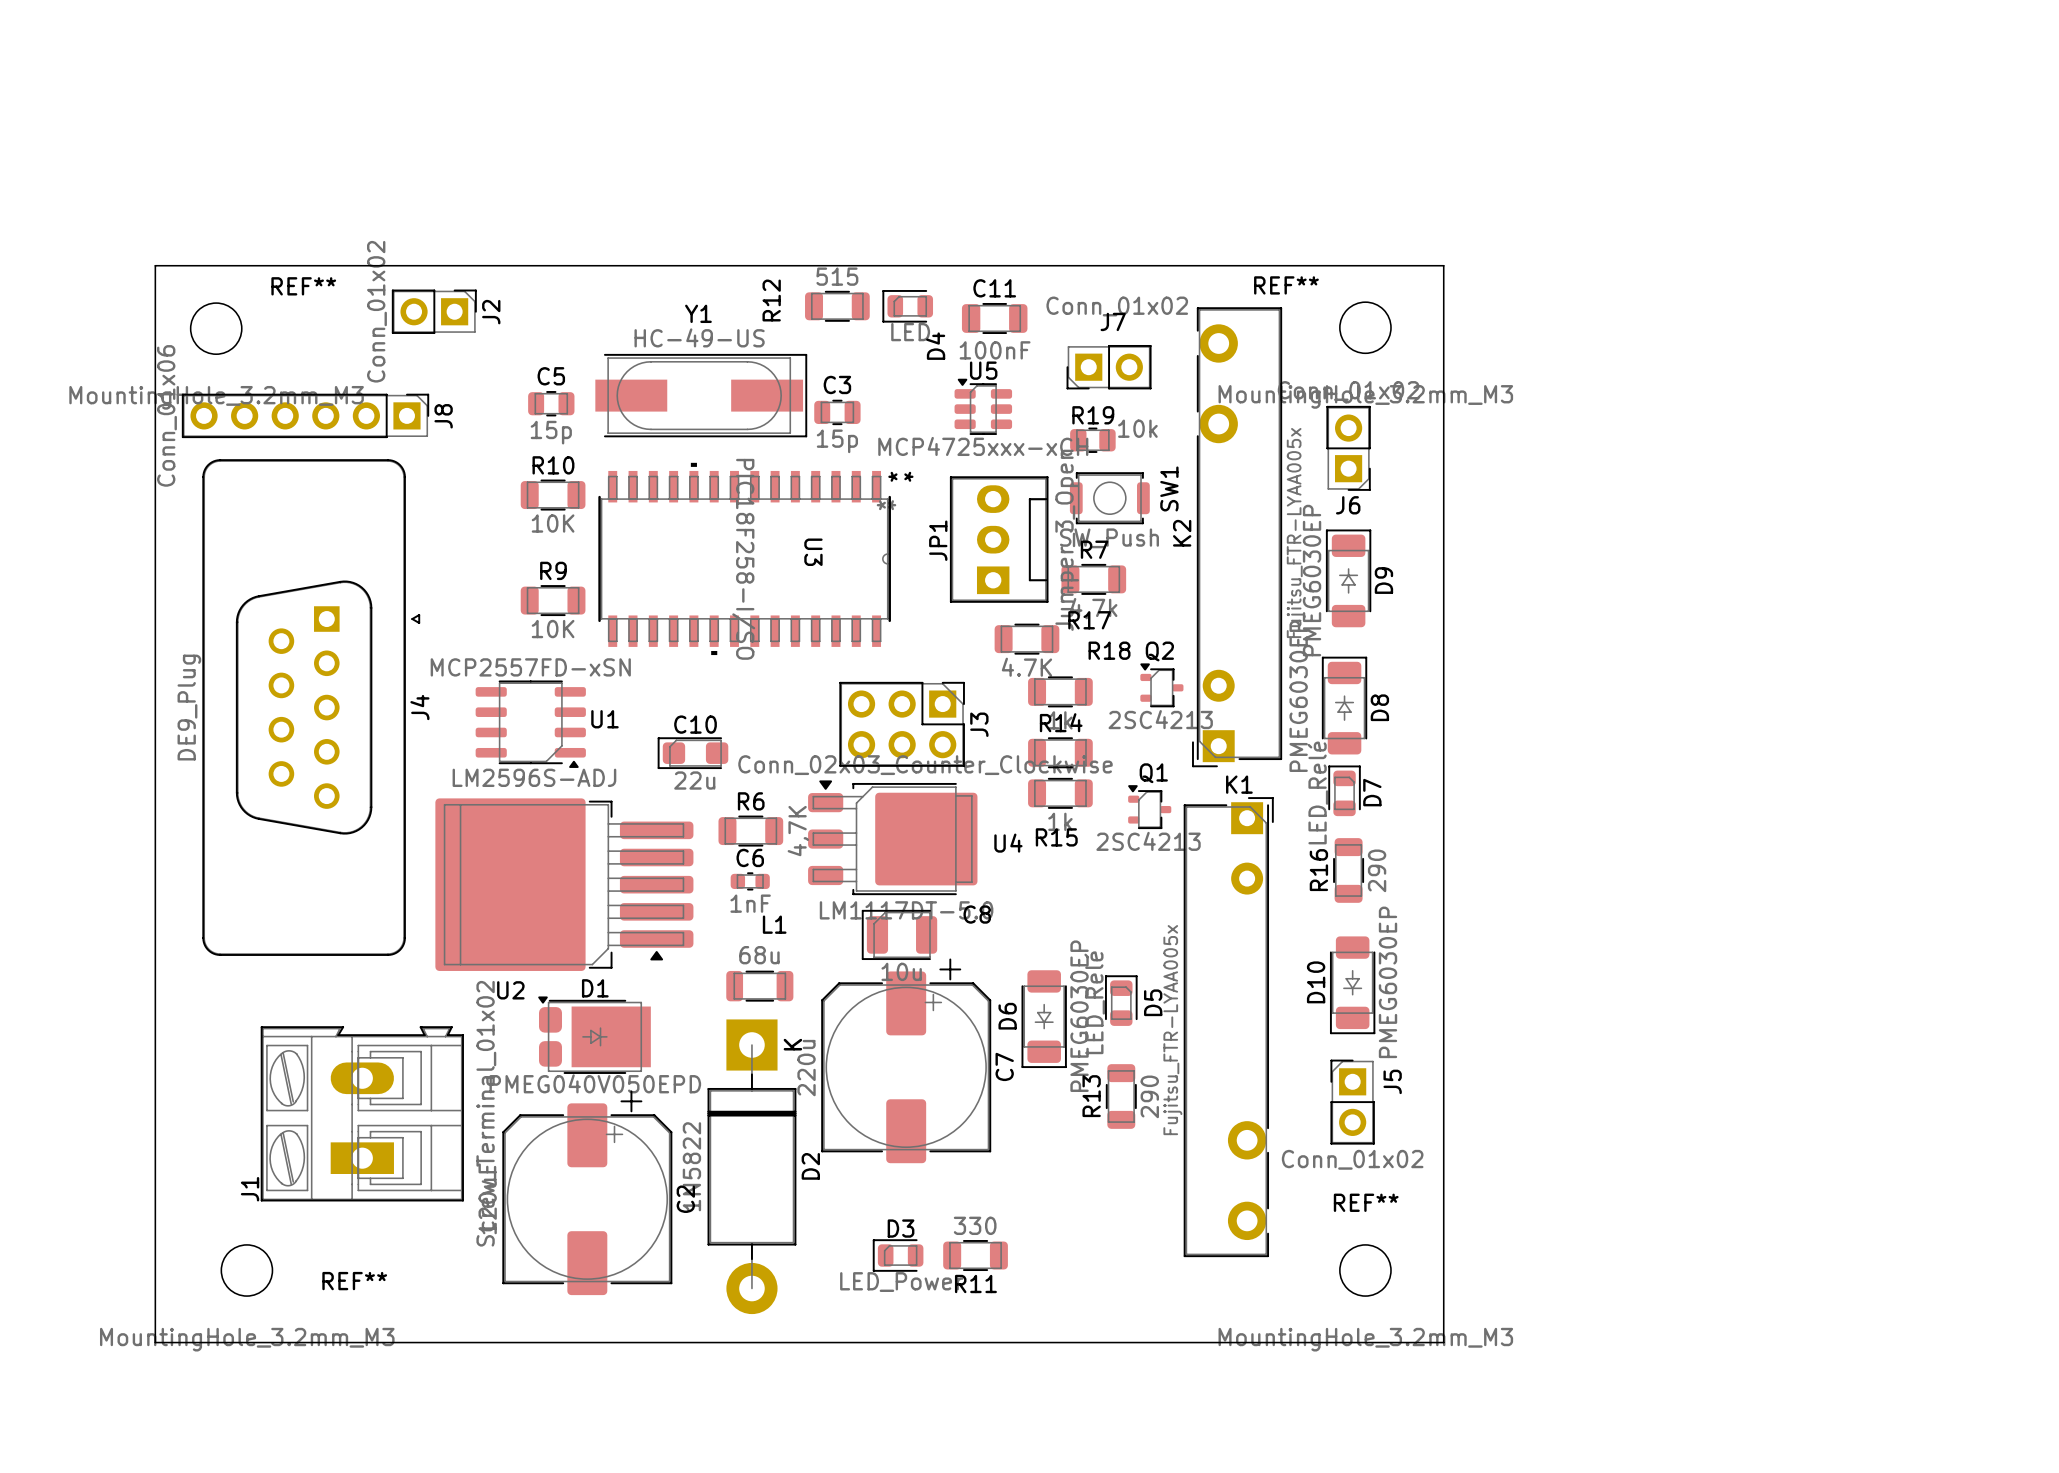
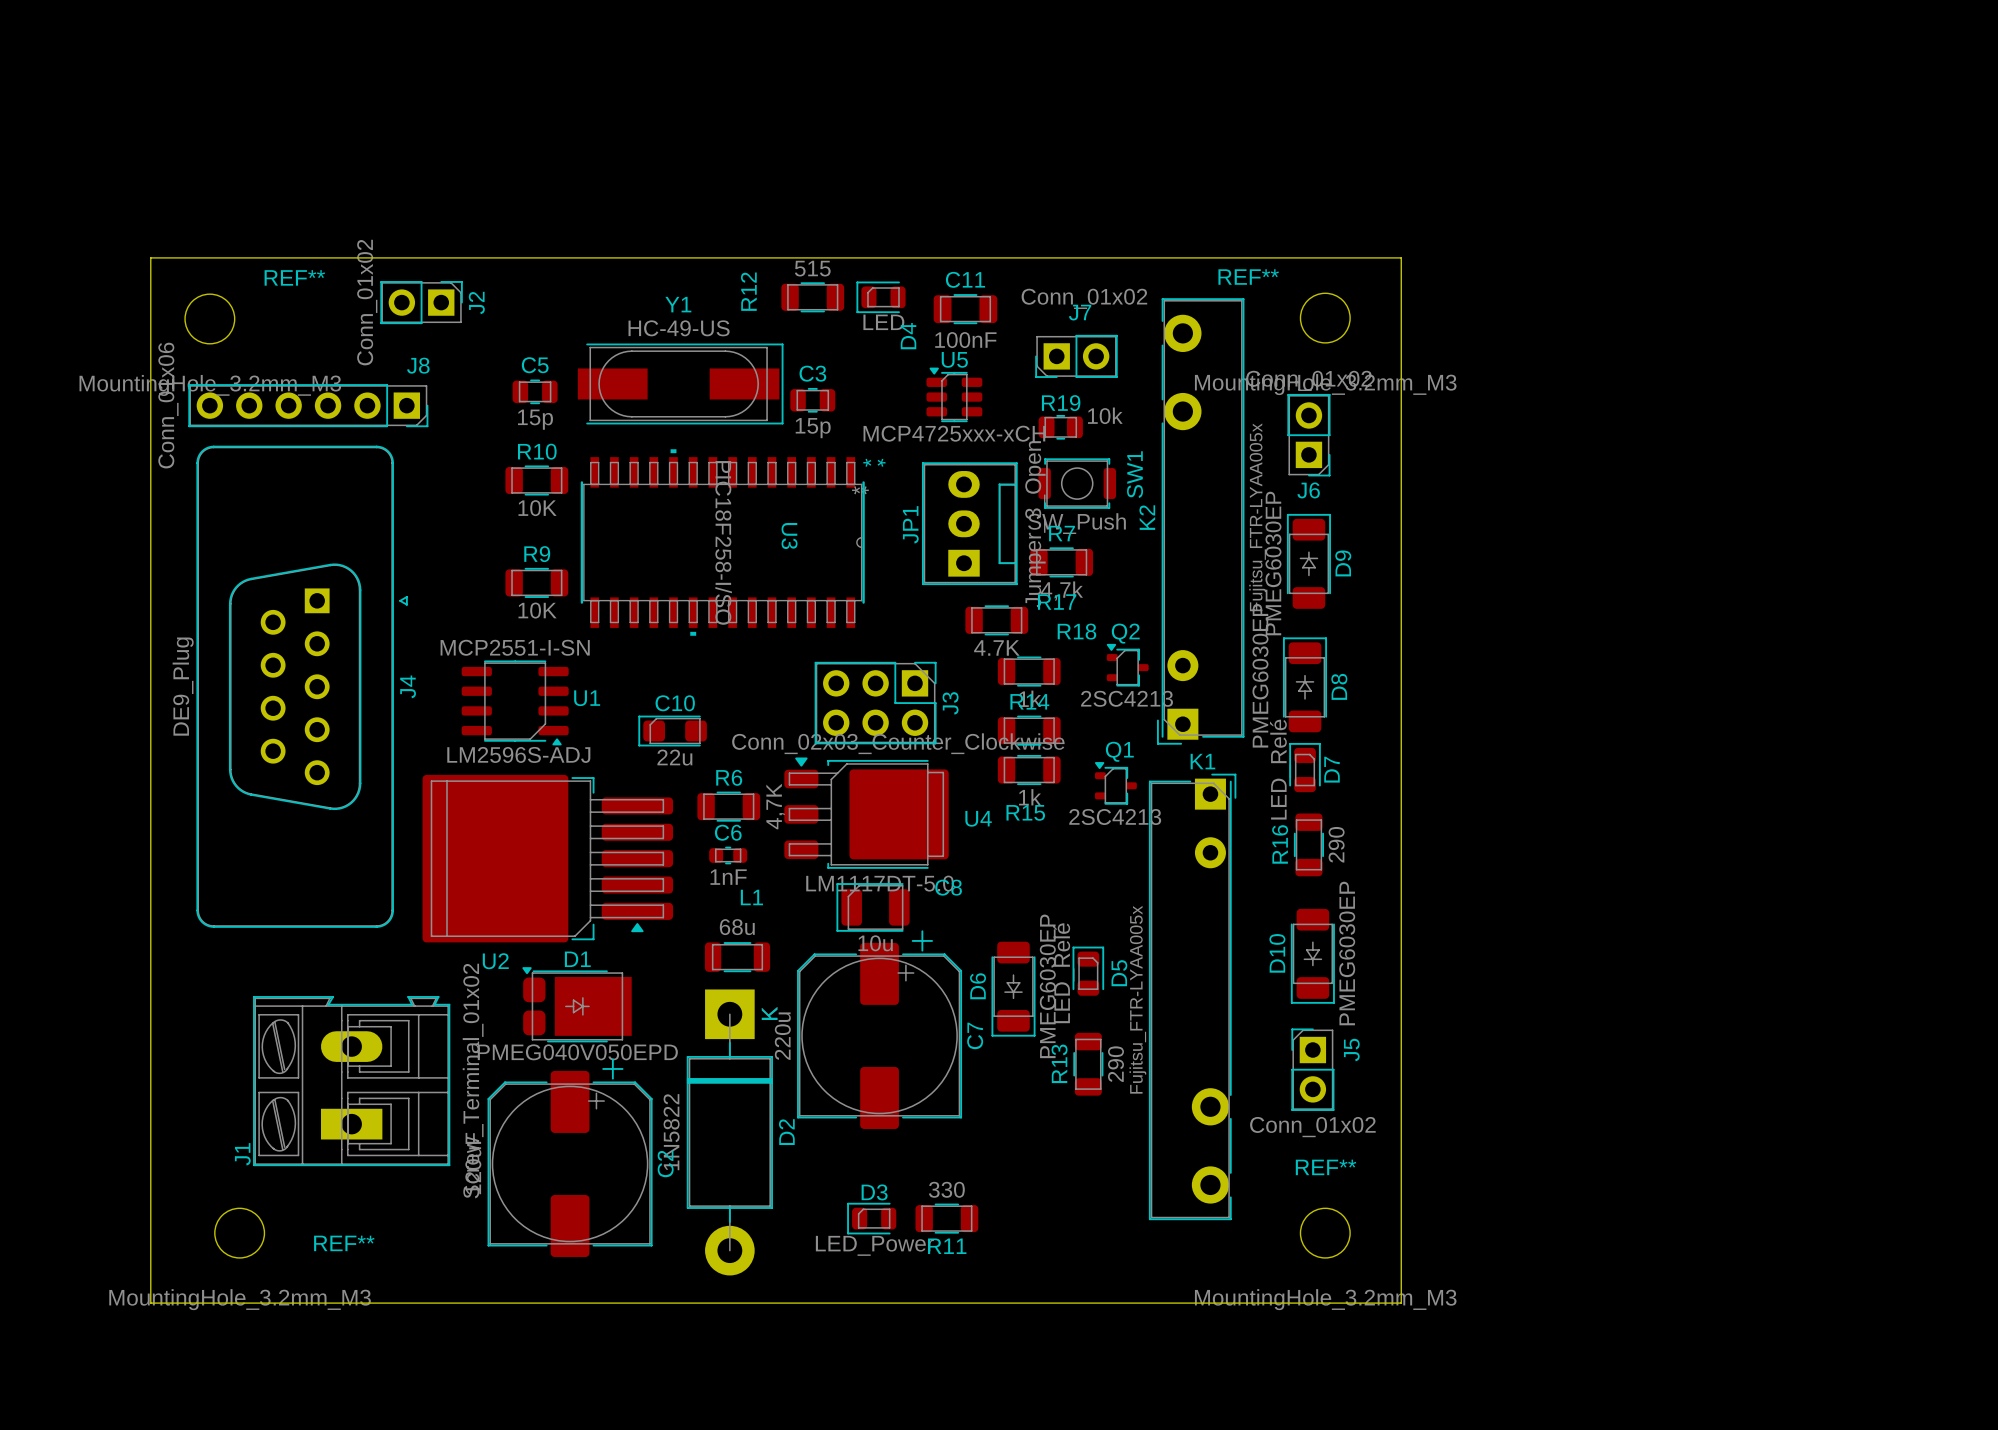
J8 footprint: [181, 393, 430, 439] -> [188, 384, 429, 428]
J8 name position: J8 (443, 416) -> J8 (418, 365)
U1 value: MCP2557FD-xSN (530, 667) -> MCP2551-I-SN (515, 647)

